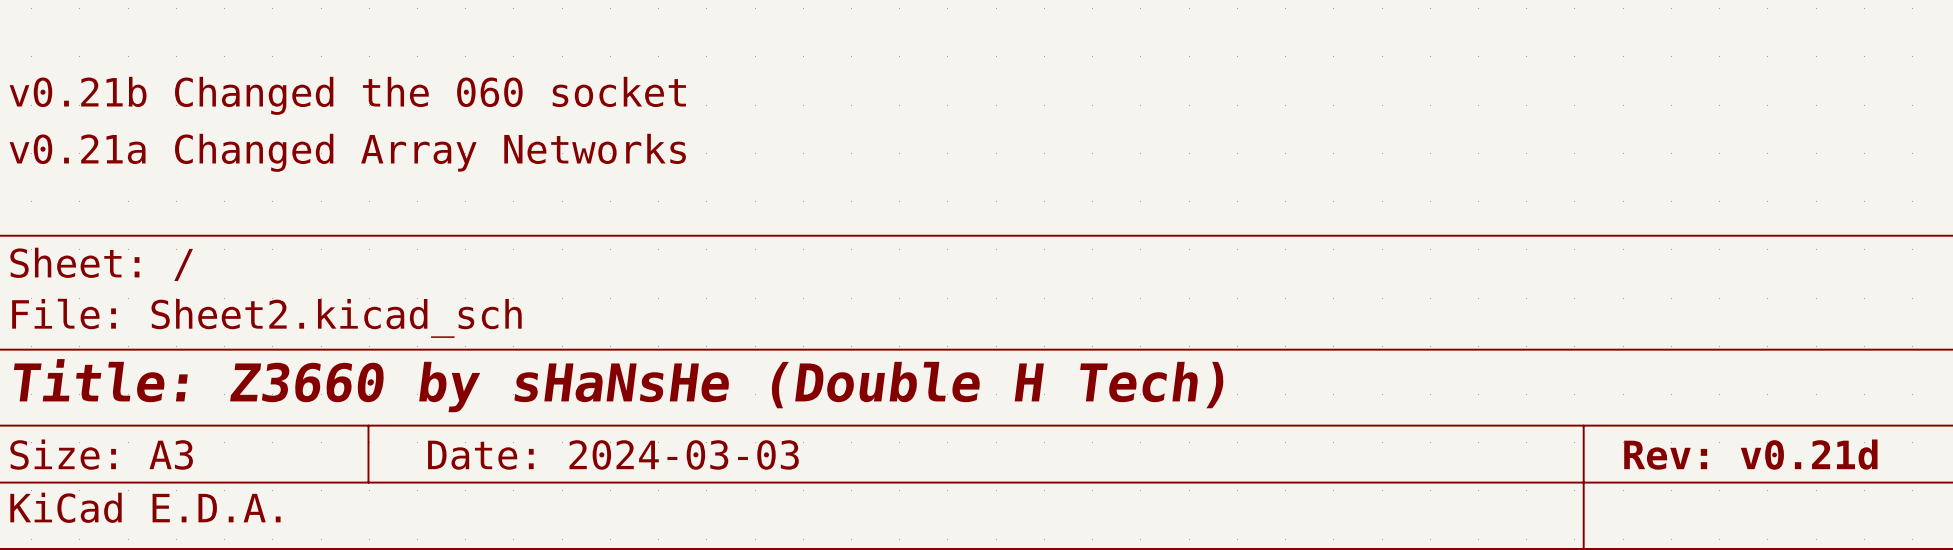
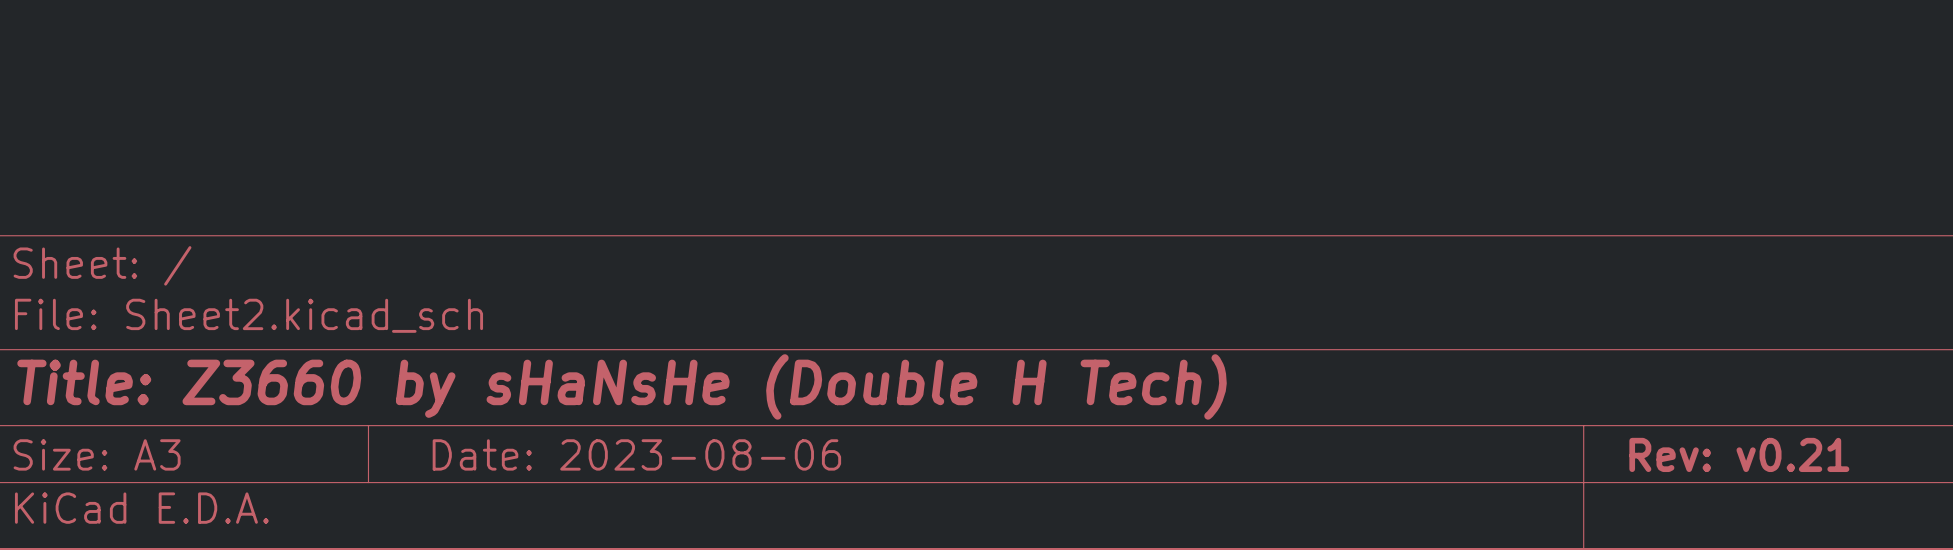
title block: v0.21b Changed the 060 socket (347, 95) -> none
title block: v0.21a Changed Array Networks (347, 152) -> none
title block: Date: 2024-03-03 (613, 454) -> Date: 2023-08-06 (636, 454)
title block: Rev: v0.21d (1750, 454) -> Rev: v0.21 (1739, 454)

